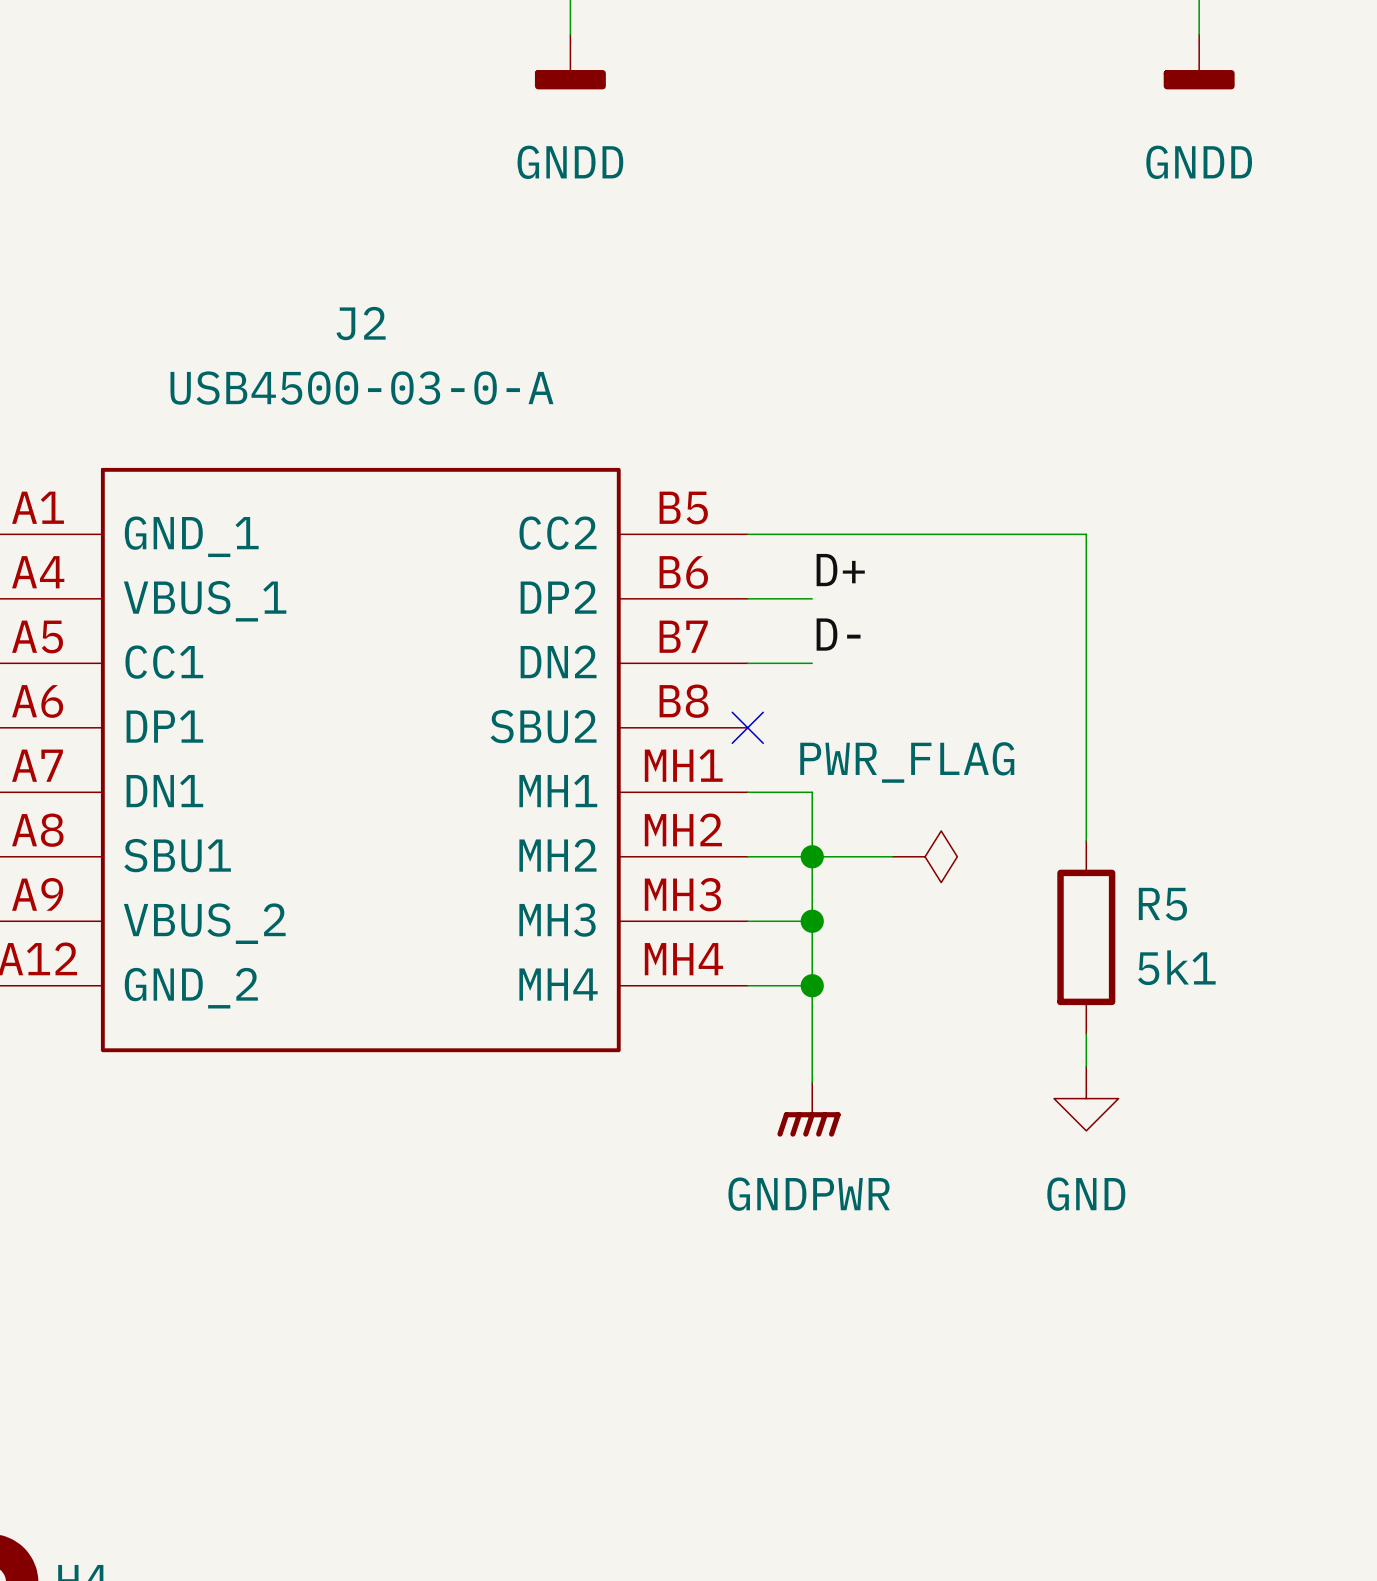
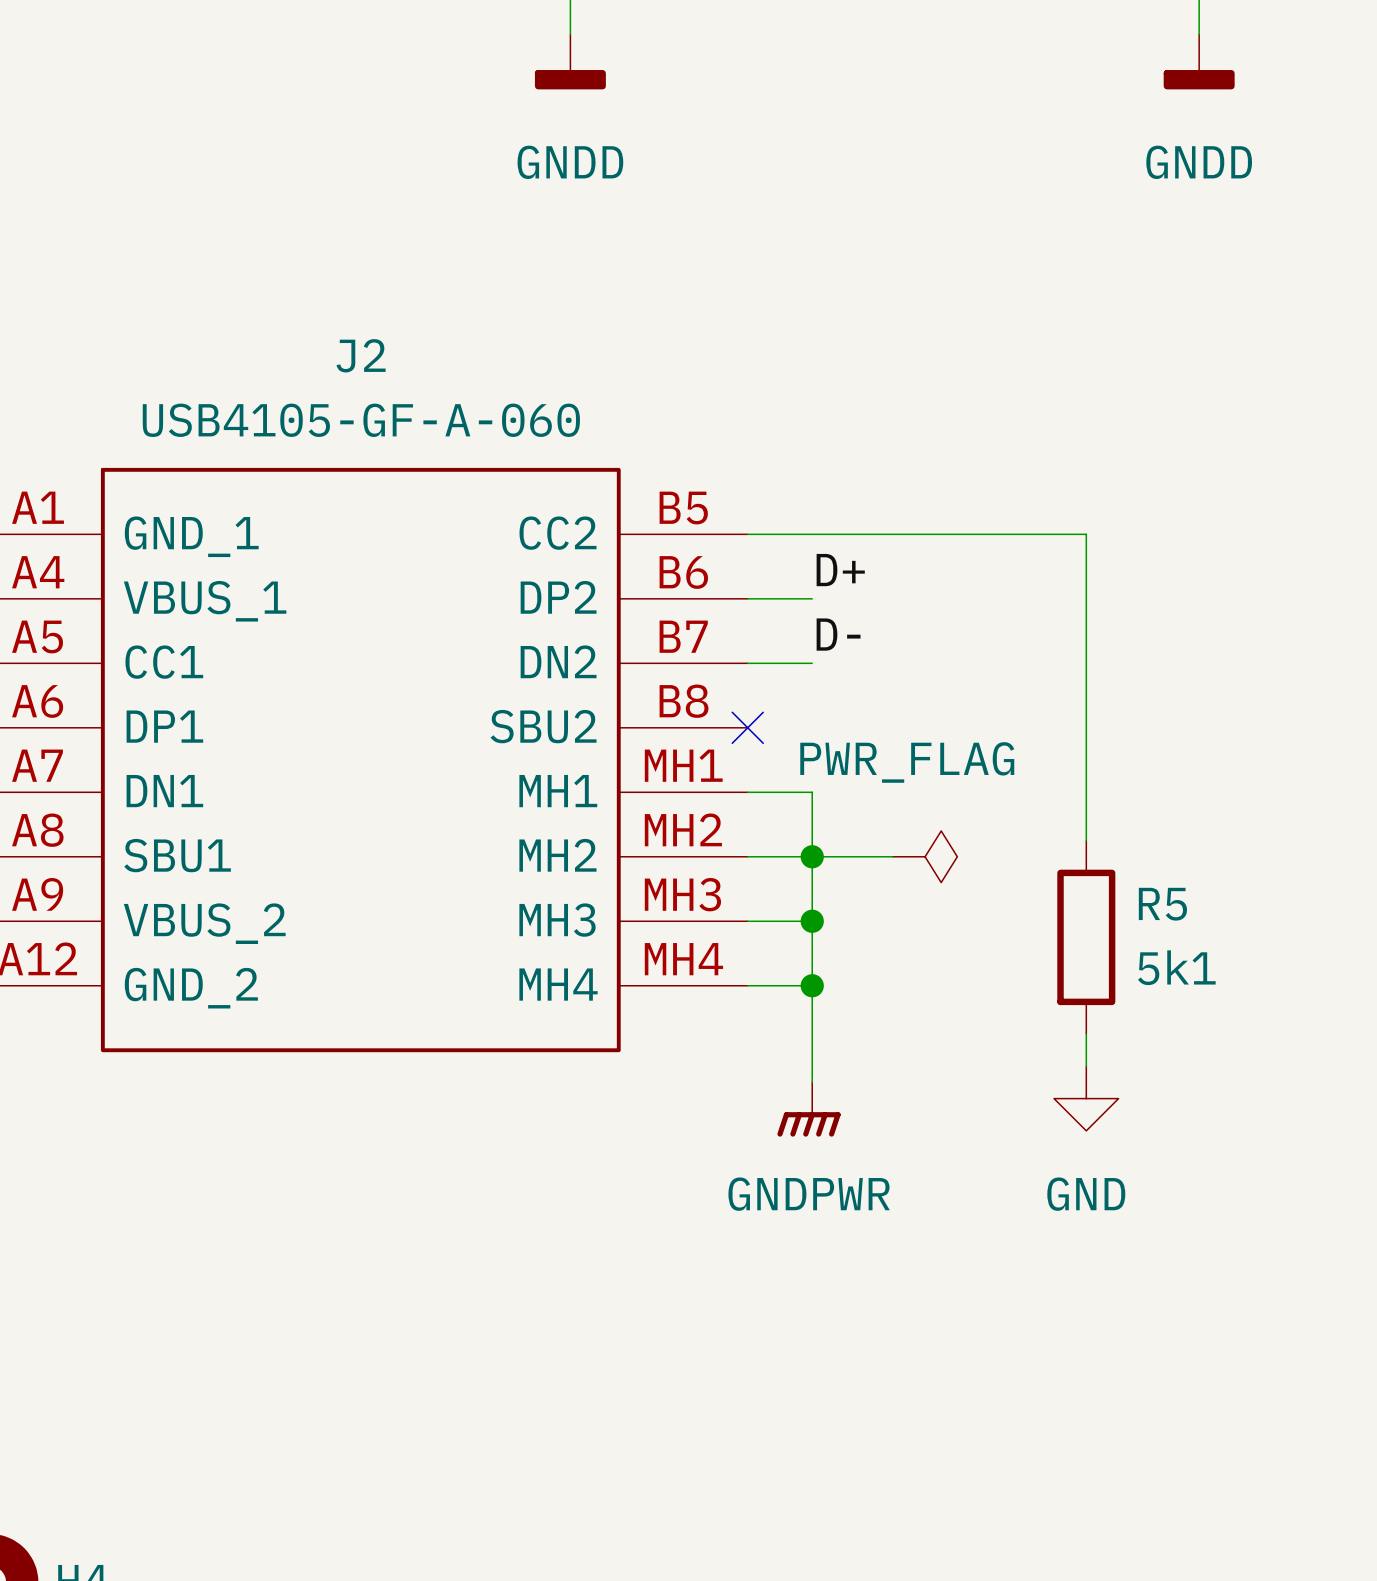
J2 name position: J2 (361, 323) -> J2 (361, 355)
J2 value: USB4500-03-0-A (361, 388) -> USB4105-GF-A-060 (361, 420)

